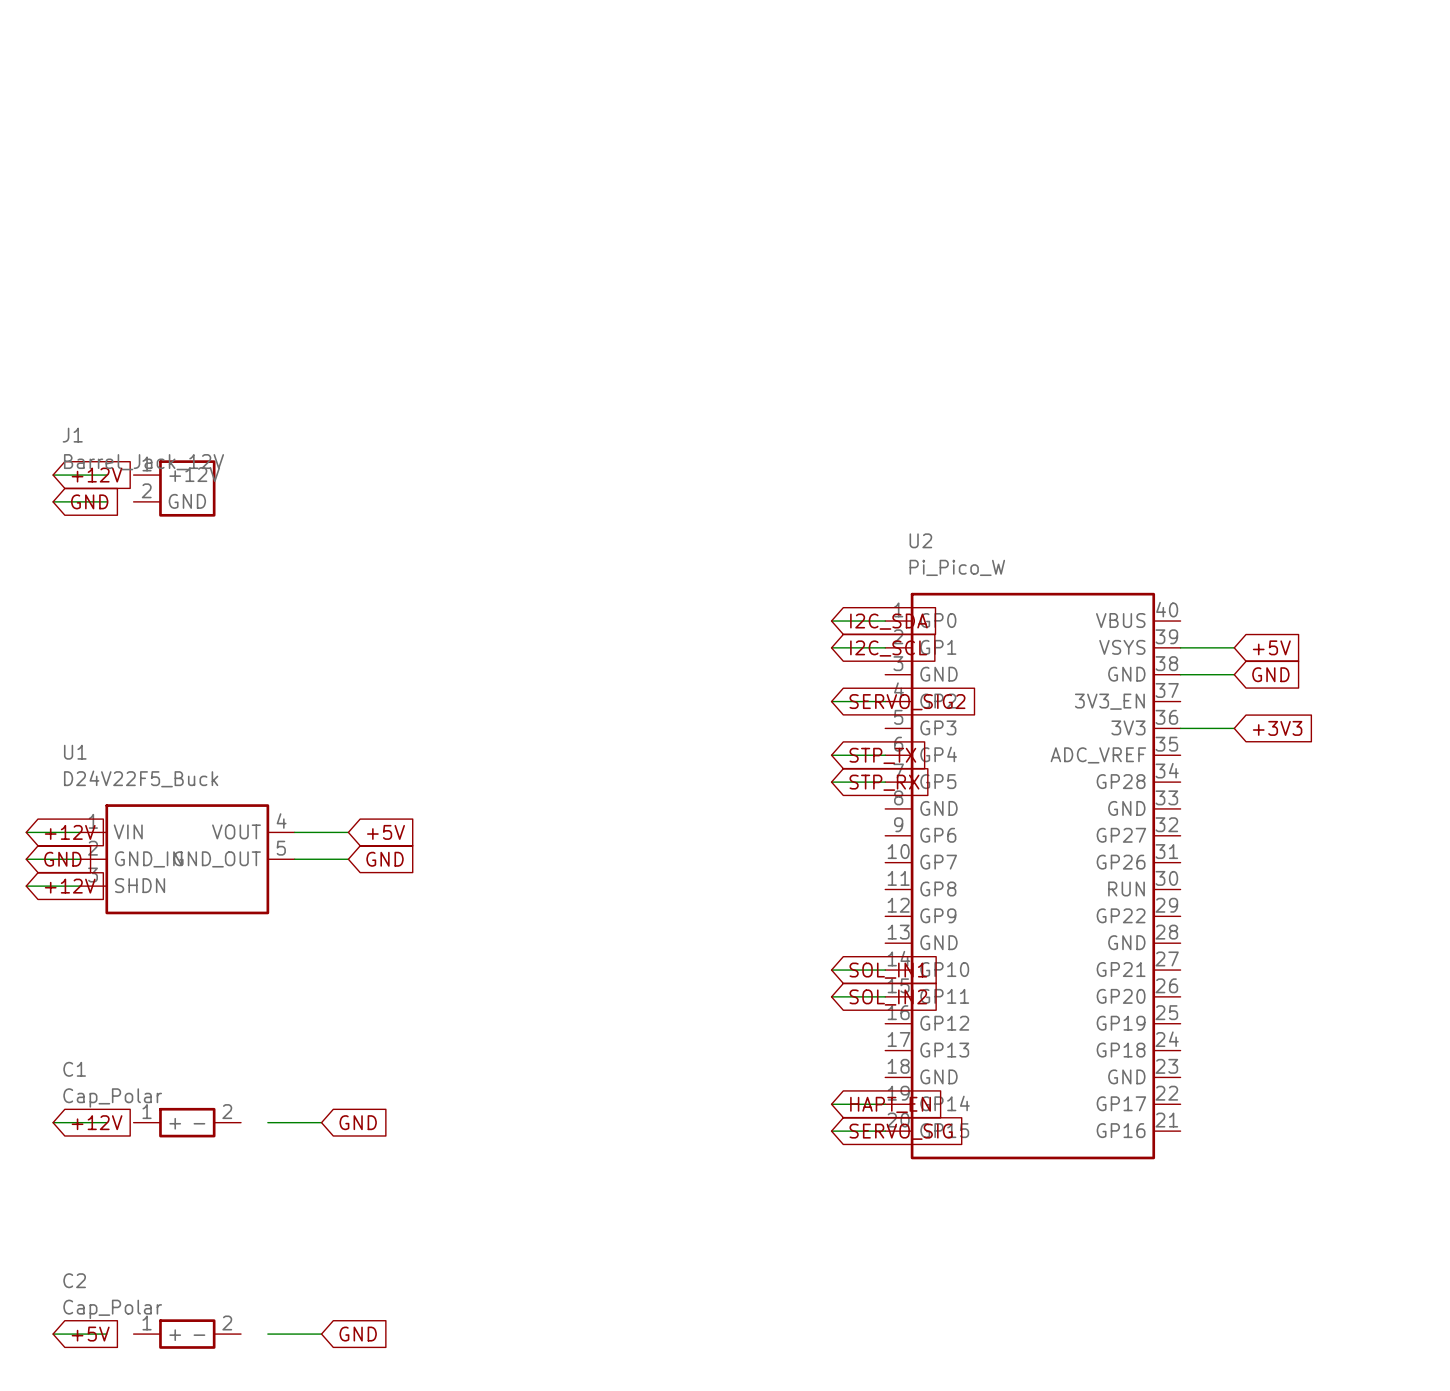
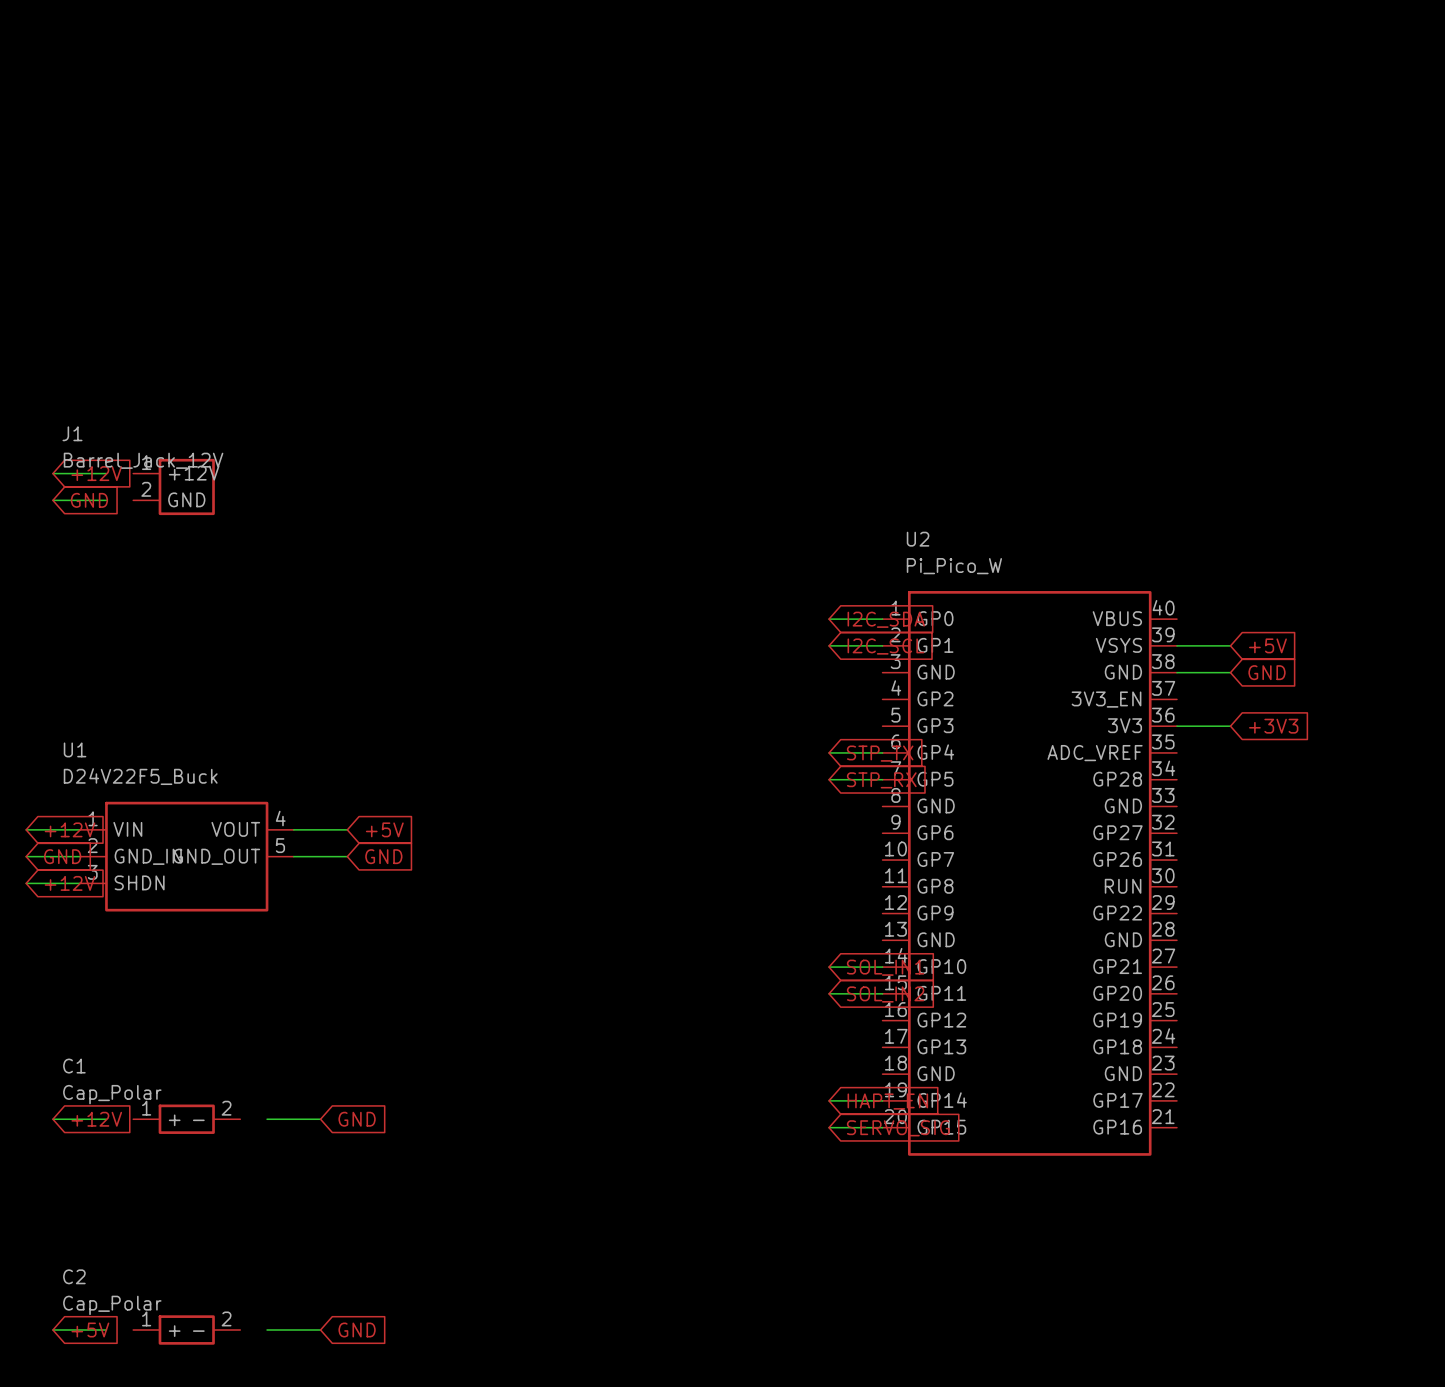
wire: (831, 701) (885, 701) -> none
global label: SERVO_SIG2 (907, 702) -> none

